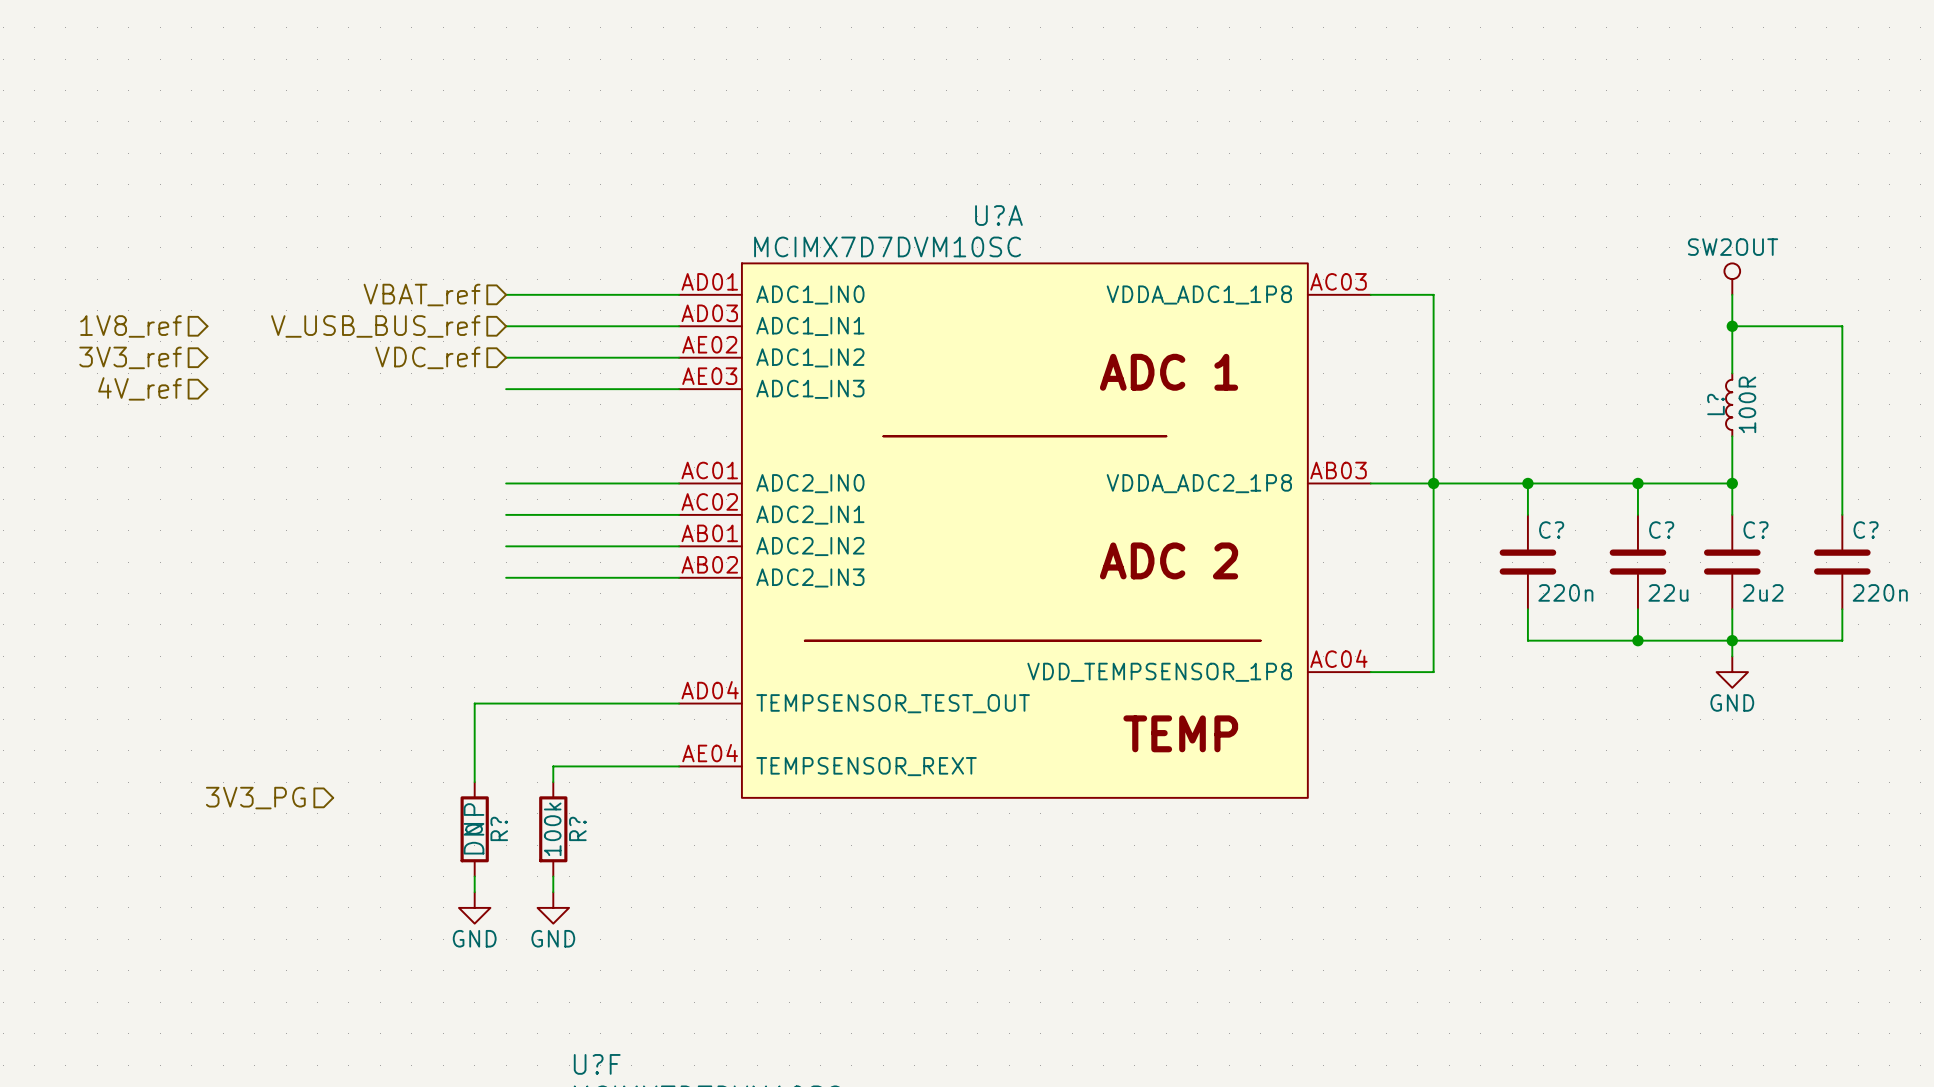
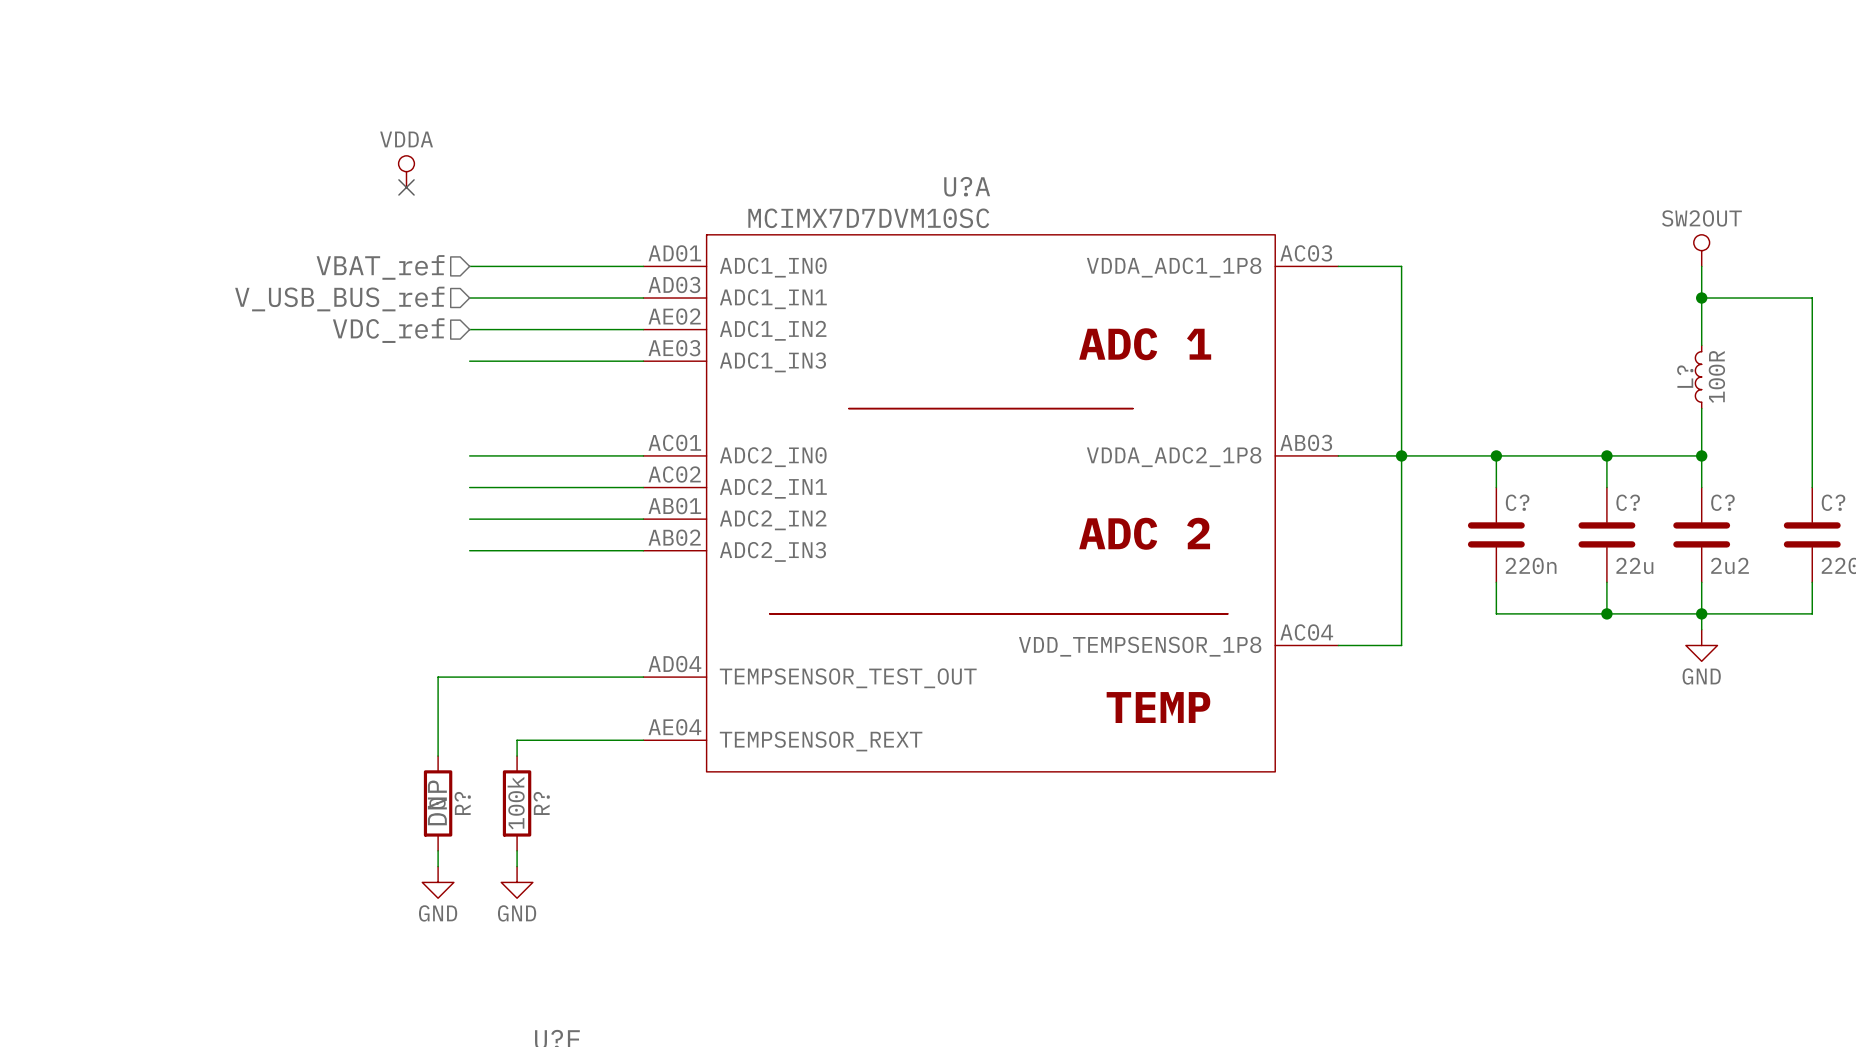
power symbol: none -> VDDA (406, 171)
no-connect mark: none -> (406, 187)
hierarchical label: 1V8_ref (130, 326) -> none
hierarchical label: 3V3_ref (130, 357) -> none
hierarchical label: 4V_ref (139, 388) -> none
hierarchical label: 3V3_PG (255, 798) -> none

